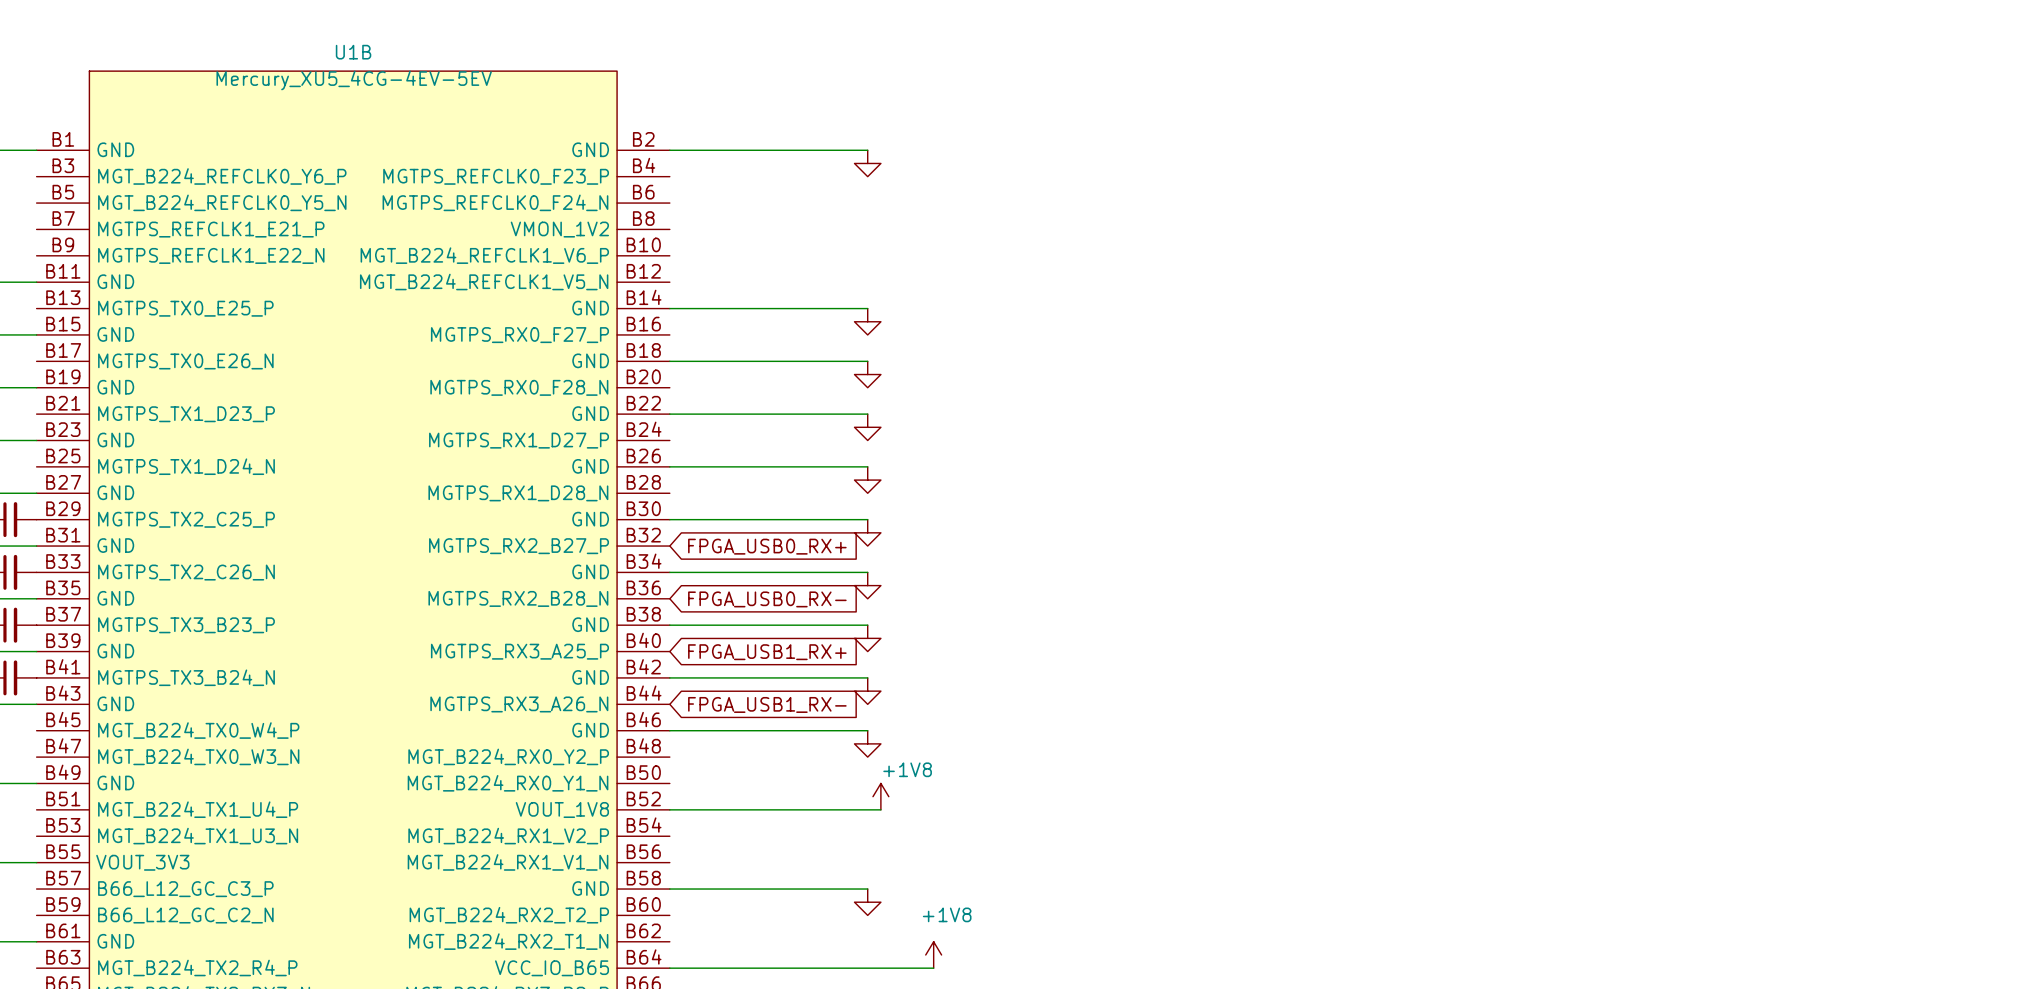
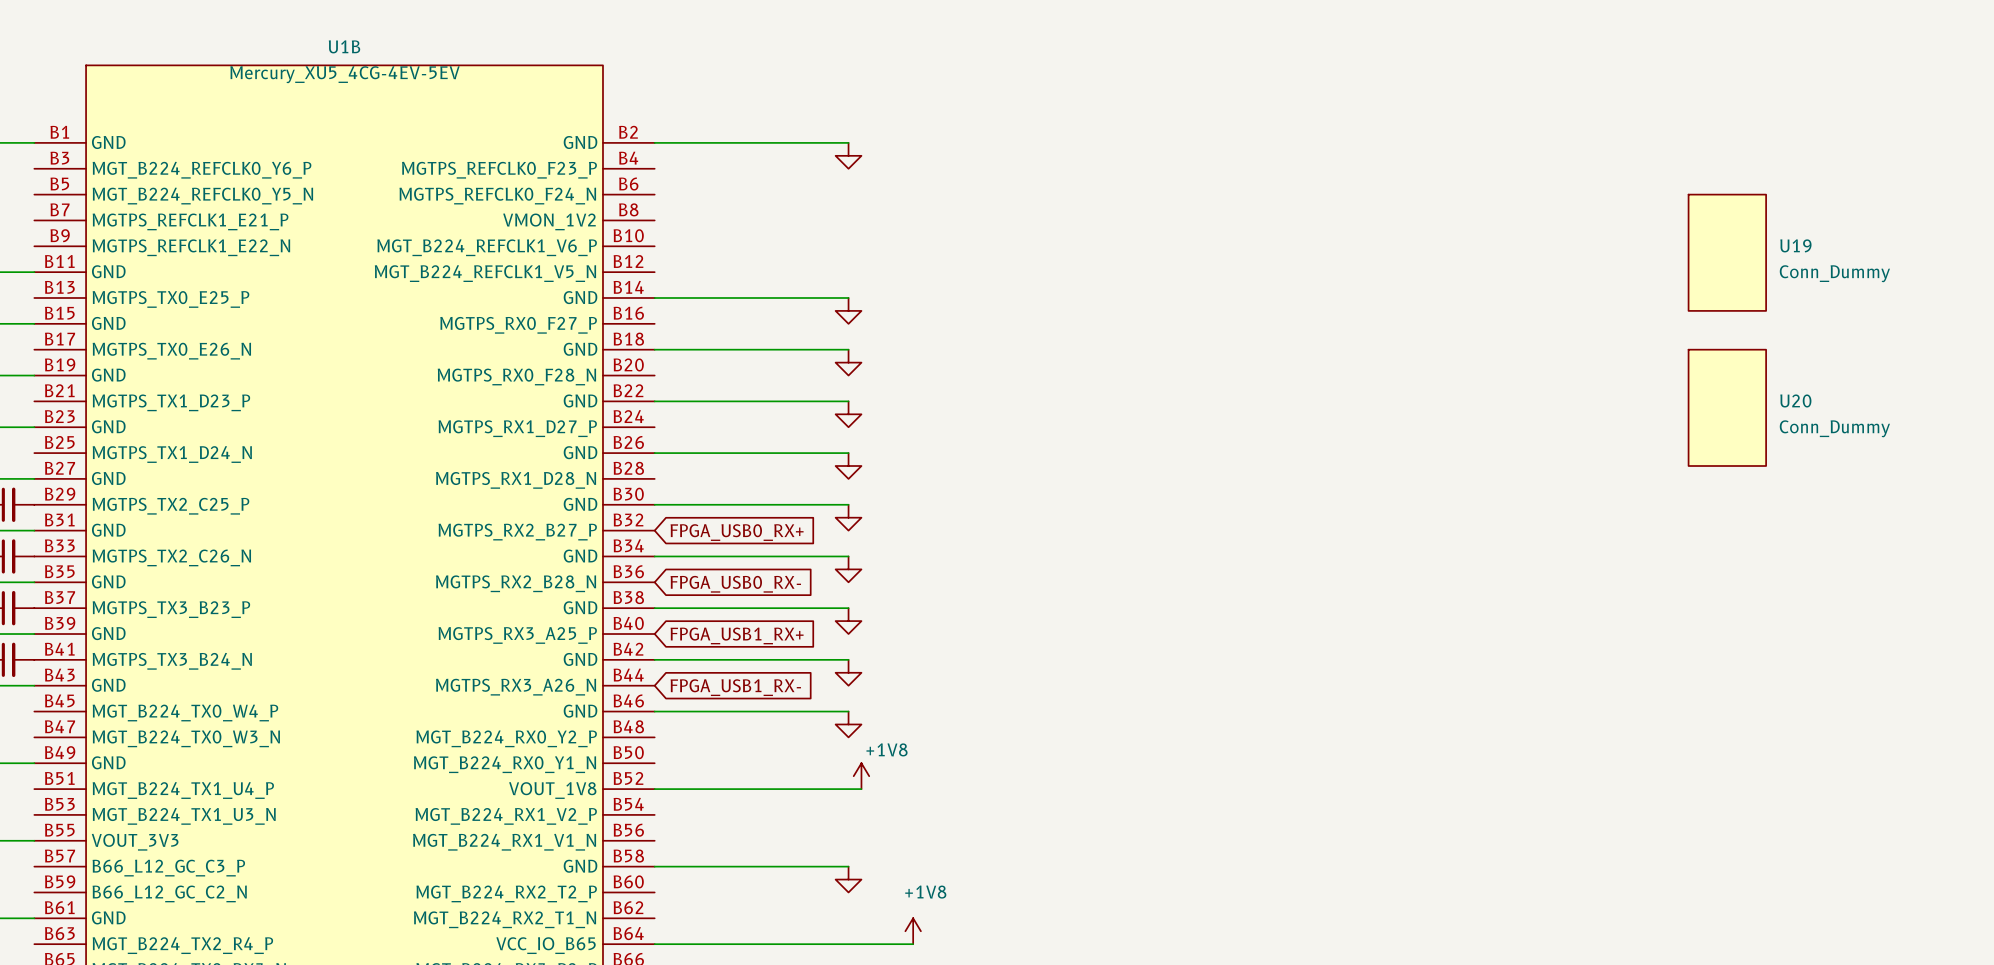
U19: none -> Conn_Dummy (1727, 252)
U20: none -> Conn_Dummy (1727, 407)

